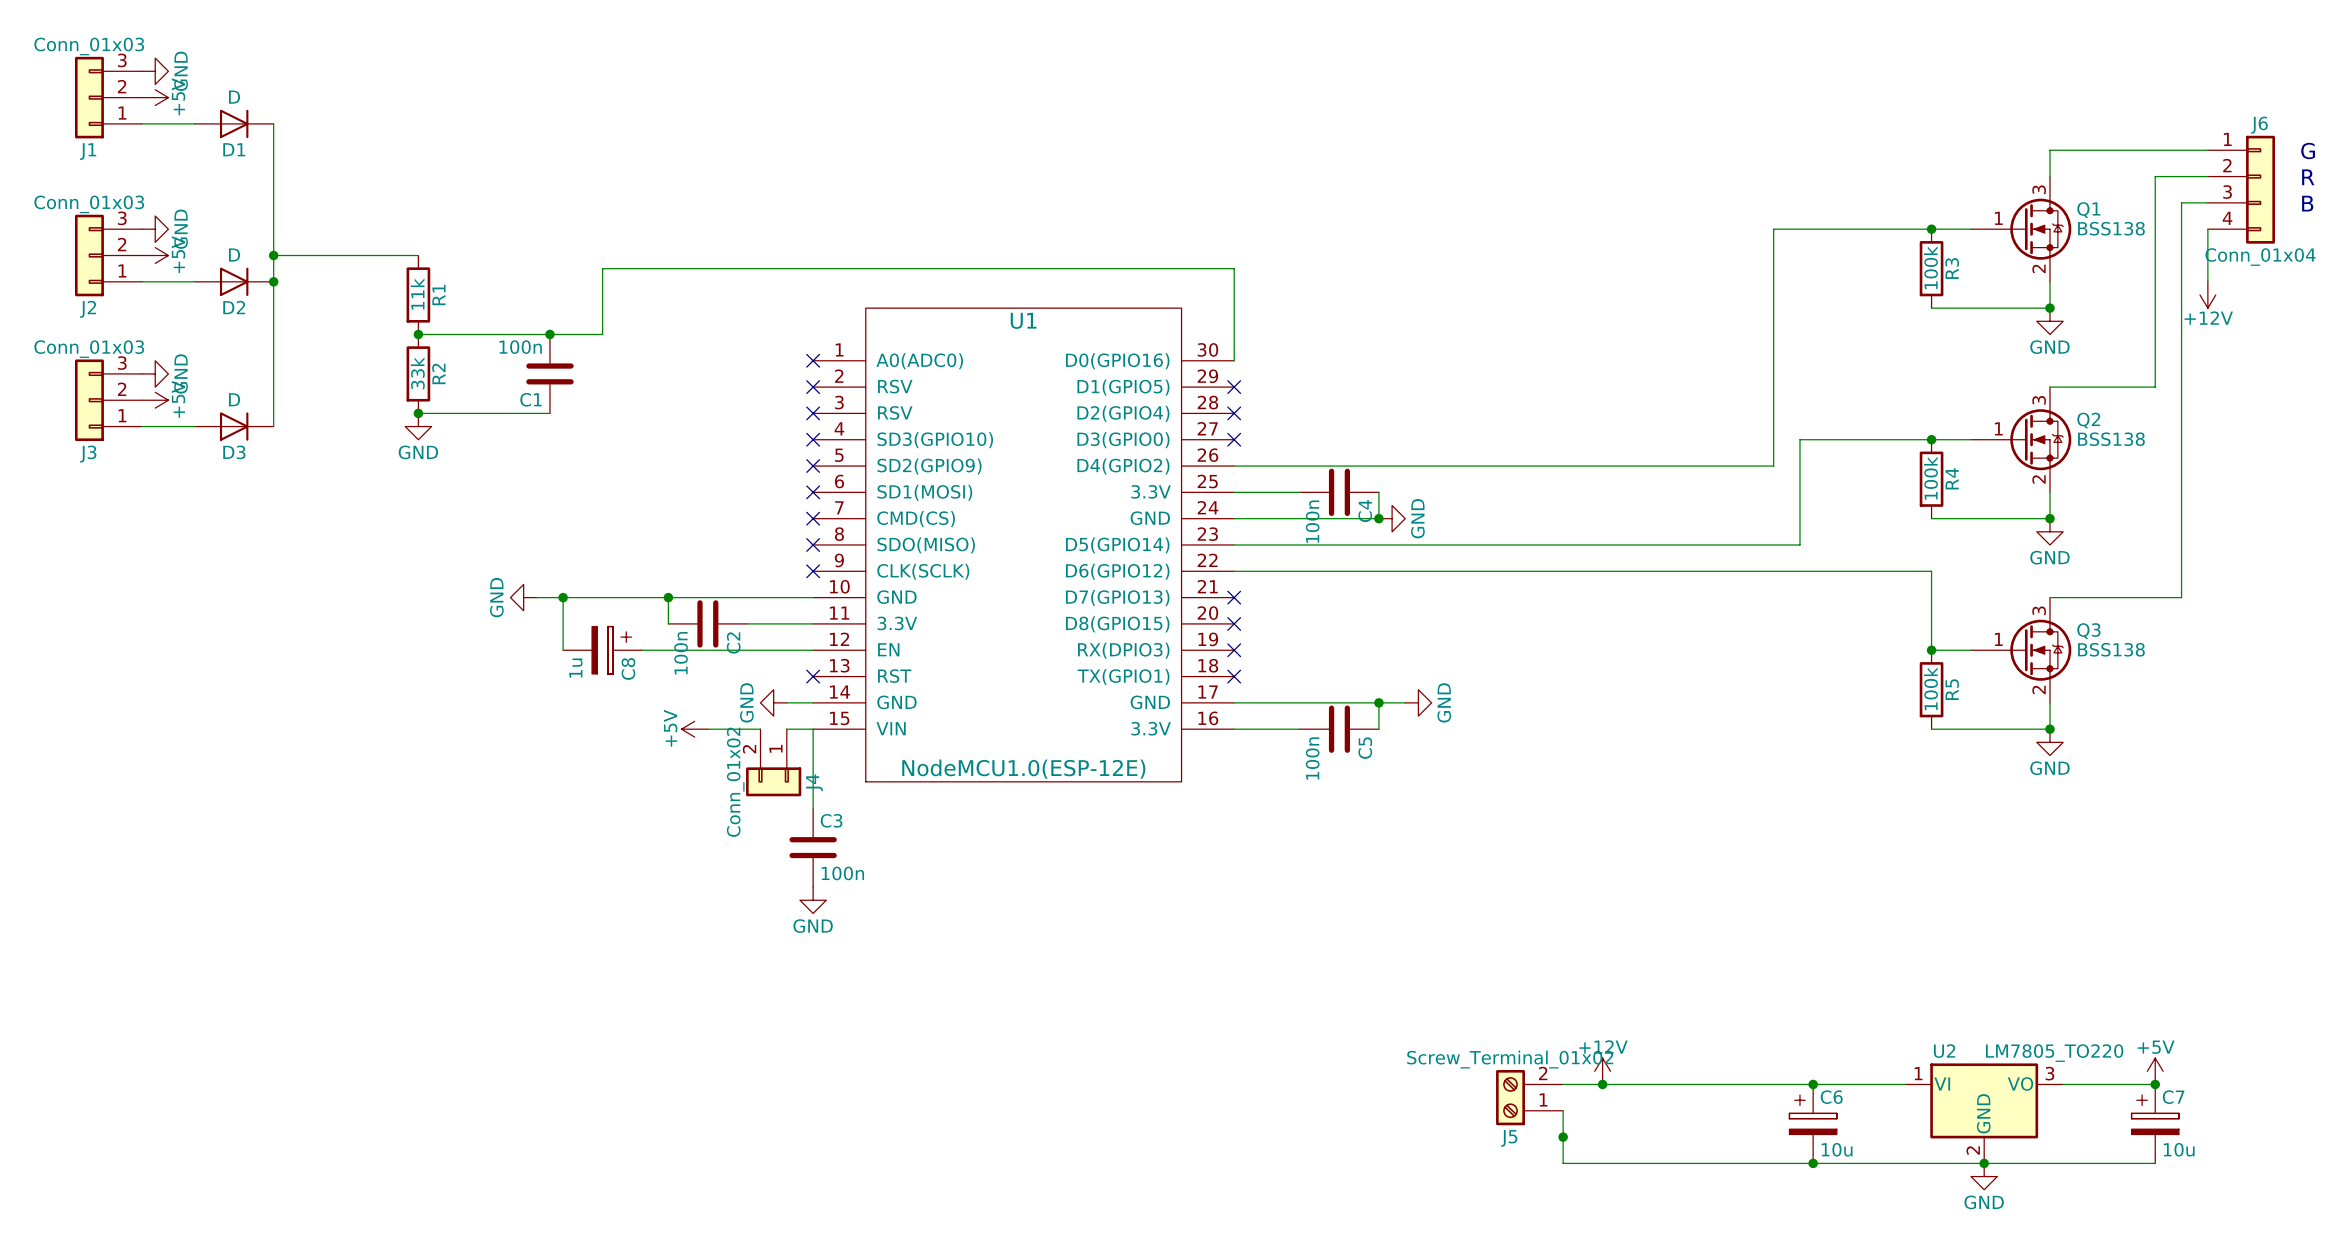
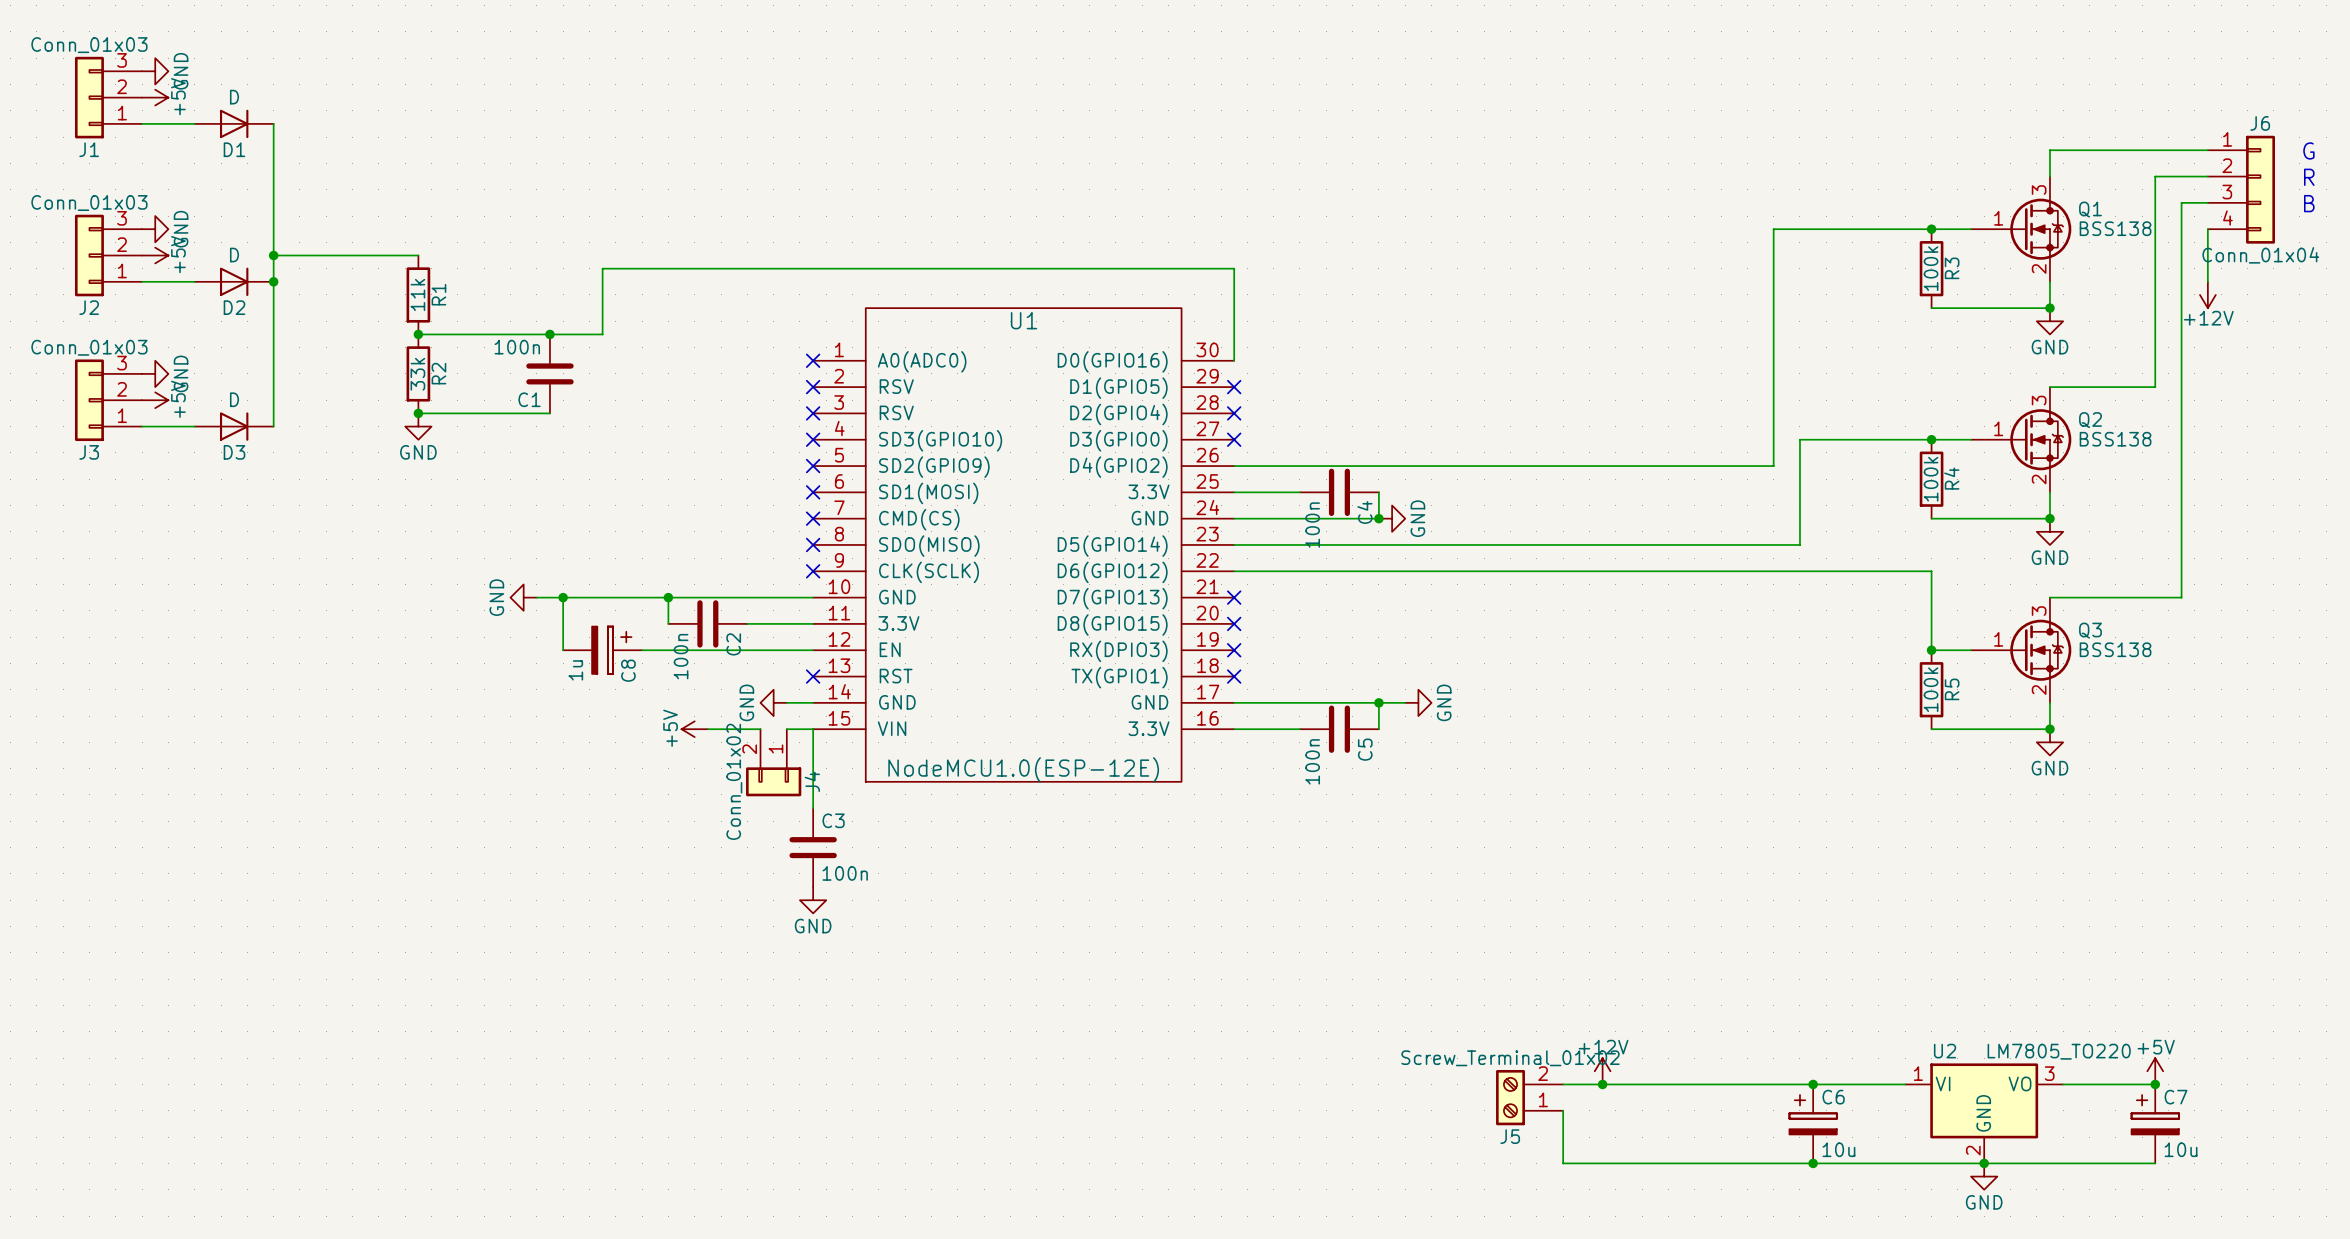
junction: (1563, 1137) -> none

